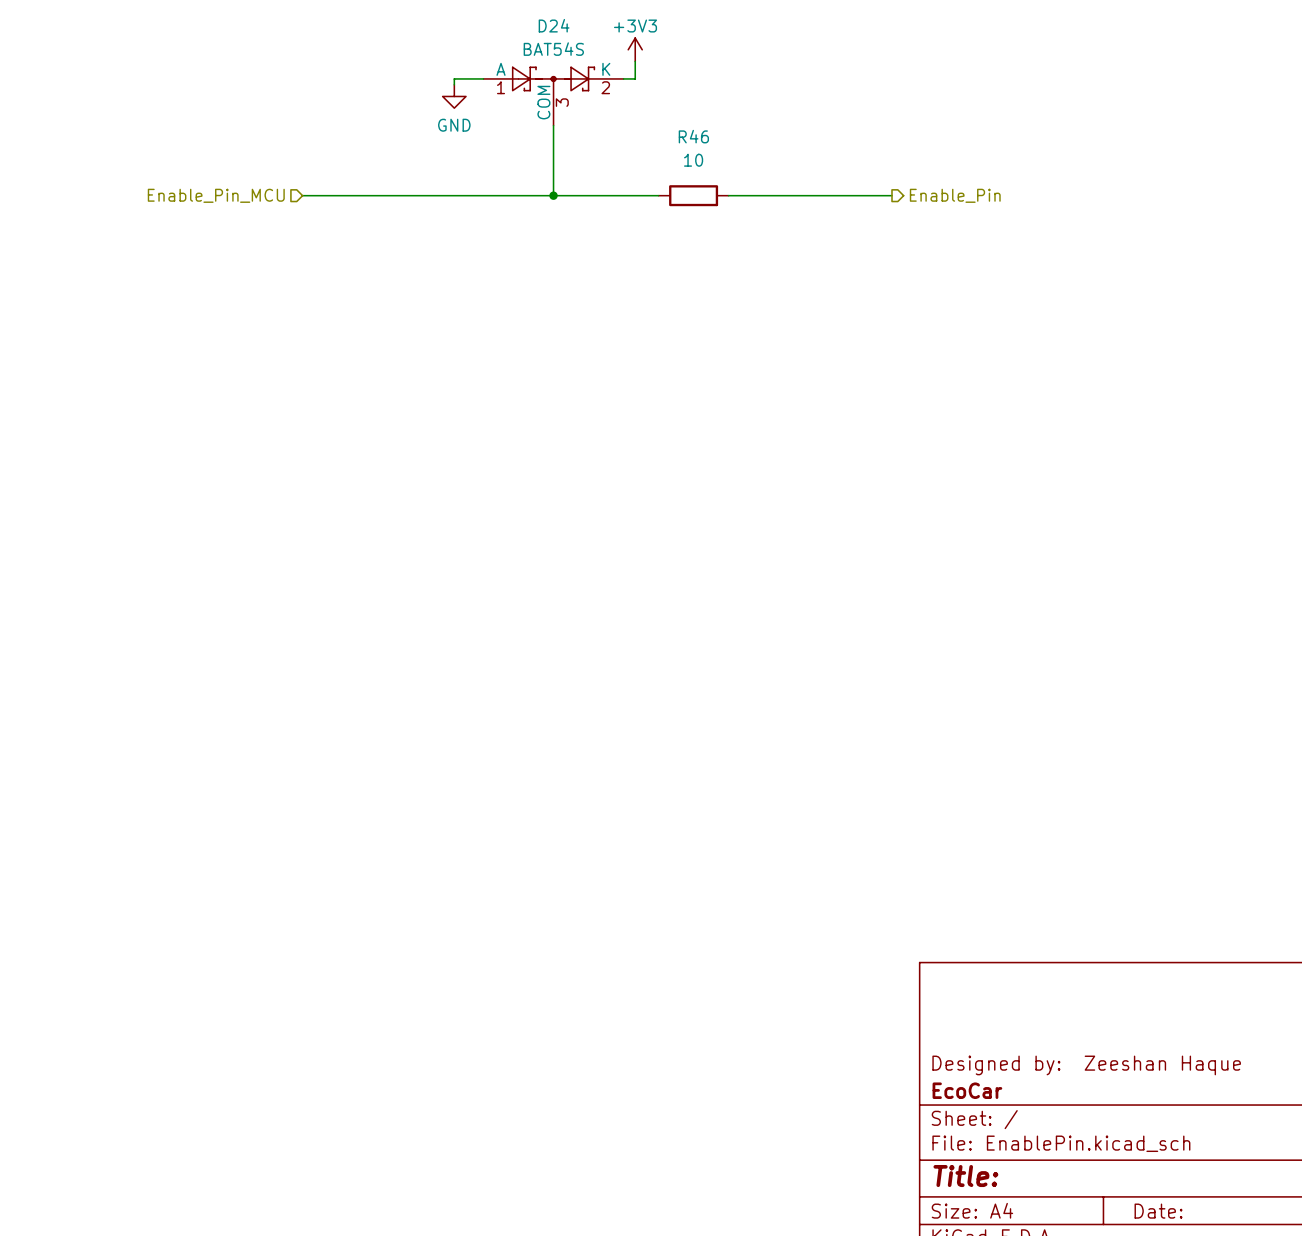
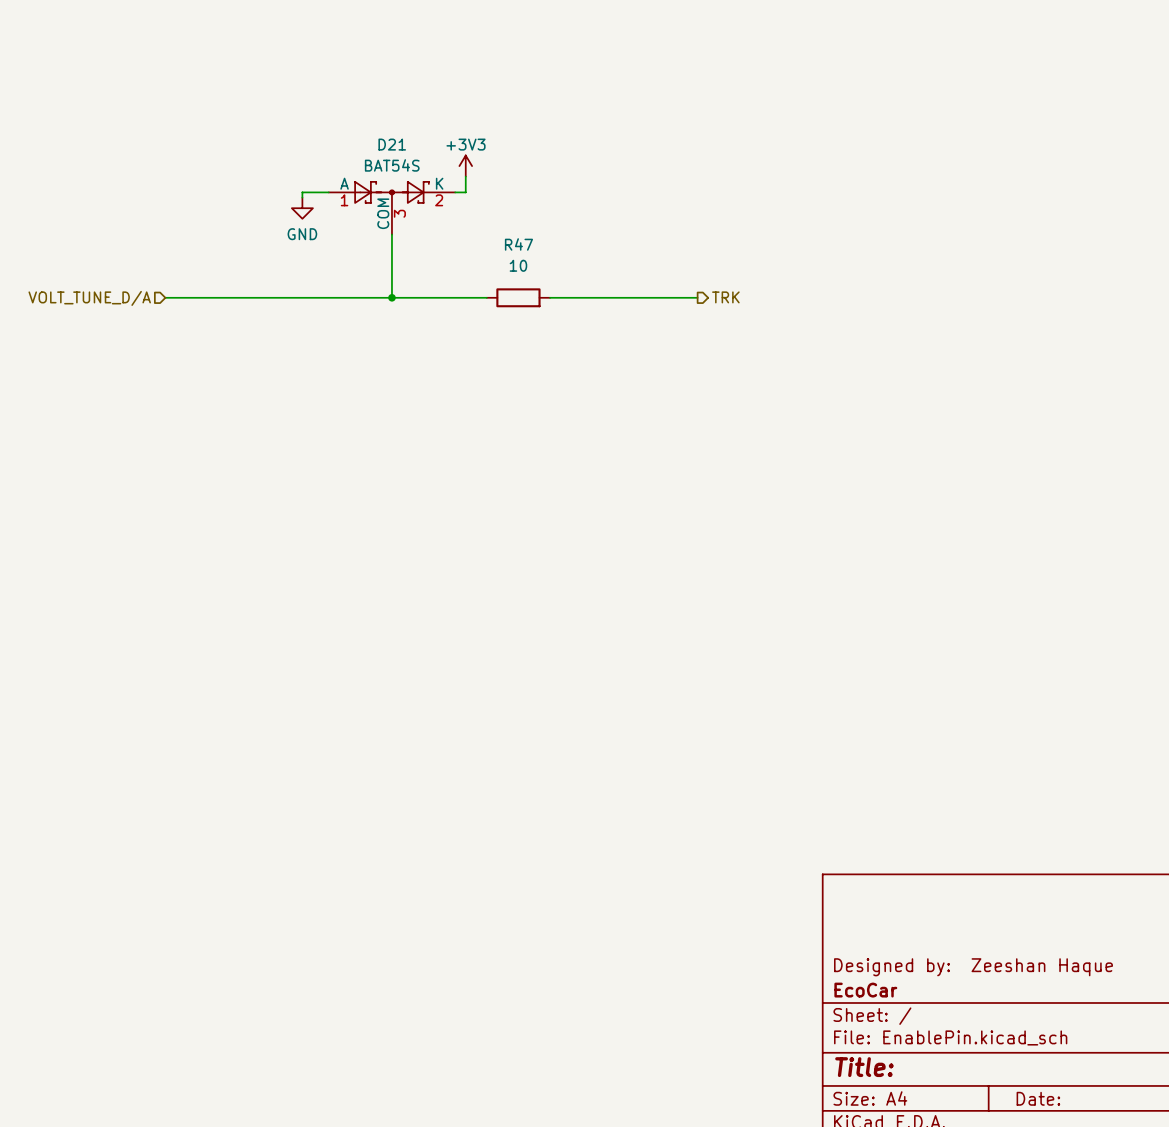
power symbol position: +3V3 (635, 49) -> +3V3 (465, 166)
wire: (635, 61) (635, 78) (623, 78) -> (465, 176) (465, 192) (455, 192)
wire: (483, 78) (454, 78) (454, 84) -> (328, 192) (302, 192) (302, 197)
power symbol position: GND (454, 96) -> GND (302, 208)
D24: BAT54S (553, 96) -> none
wire: (553, 125) (553, 195) -> (391, 234) (391, 297)
hierarchical label: Enable_Pin_MCU (216, 195) -> none
wire: (302, 195) (658, 195) -> (165, 297) (486, 297)
junction: (553, 195) -> none
R46: 10 (693, 195) -> none
wire: (728, 195) (892, 195) -> (550, 297) (697, 297)
hierarchical label: Enable_Pin (955, 195) -> none
D21: none -> BAT54S (391, 208)
hierarchical label: none -> TRK (725, 297)
hierarchical label: none -> VOLT_TUNE_D/A (89, 298)
junction: none -> (391, 297)
R47: none -> 10 (518, 297)

